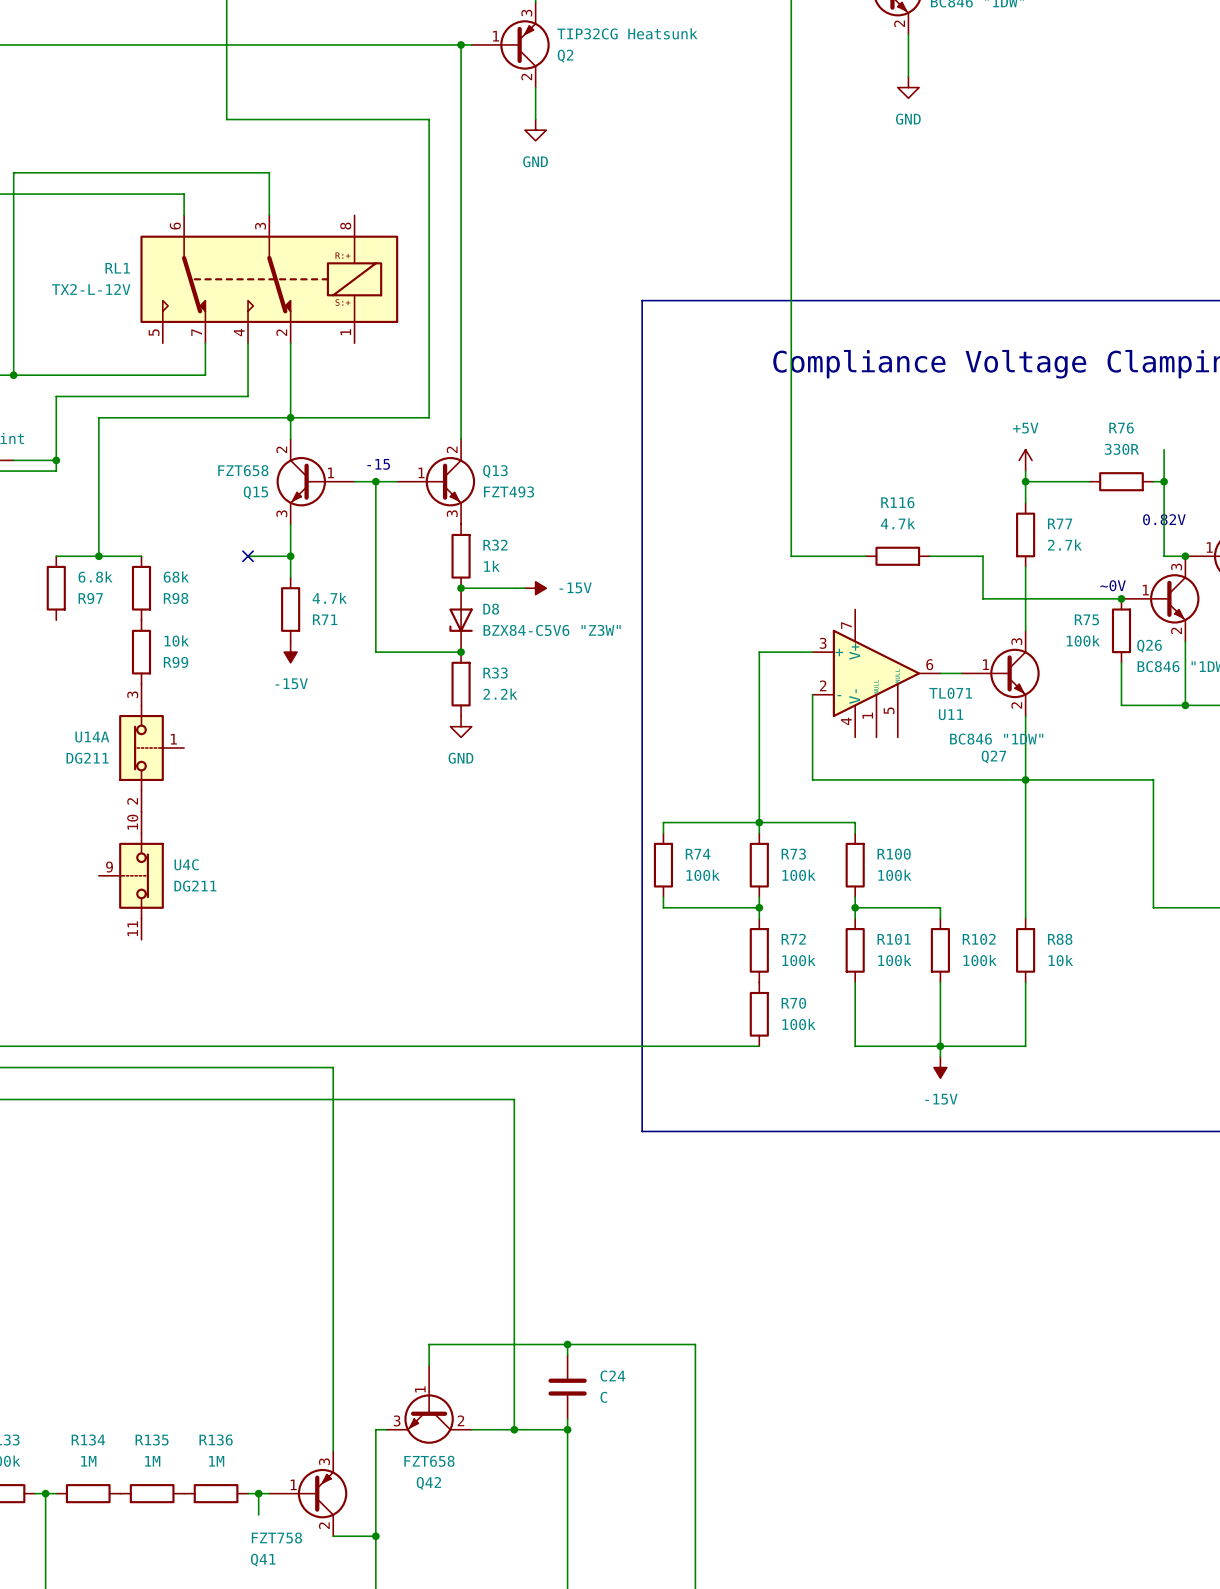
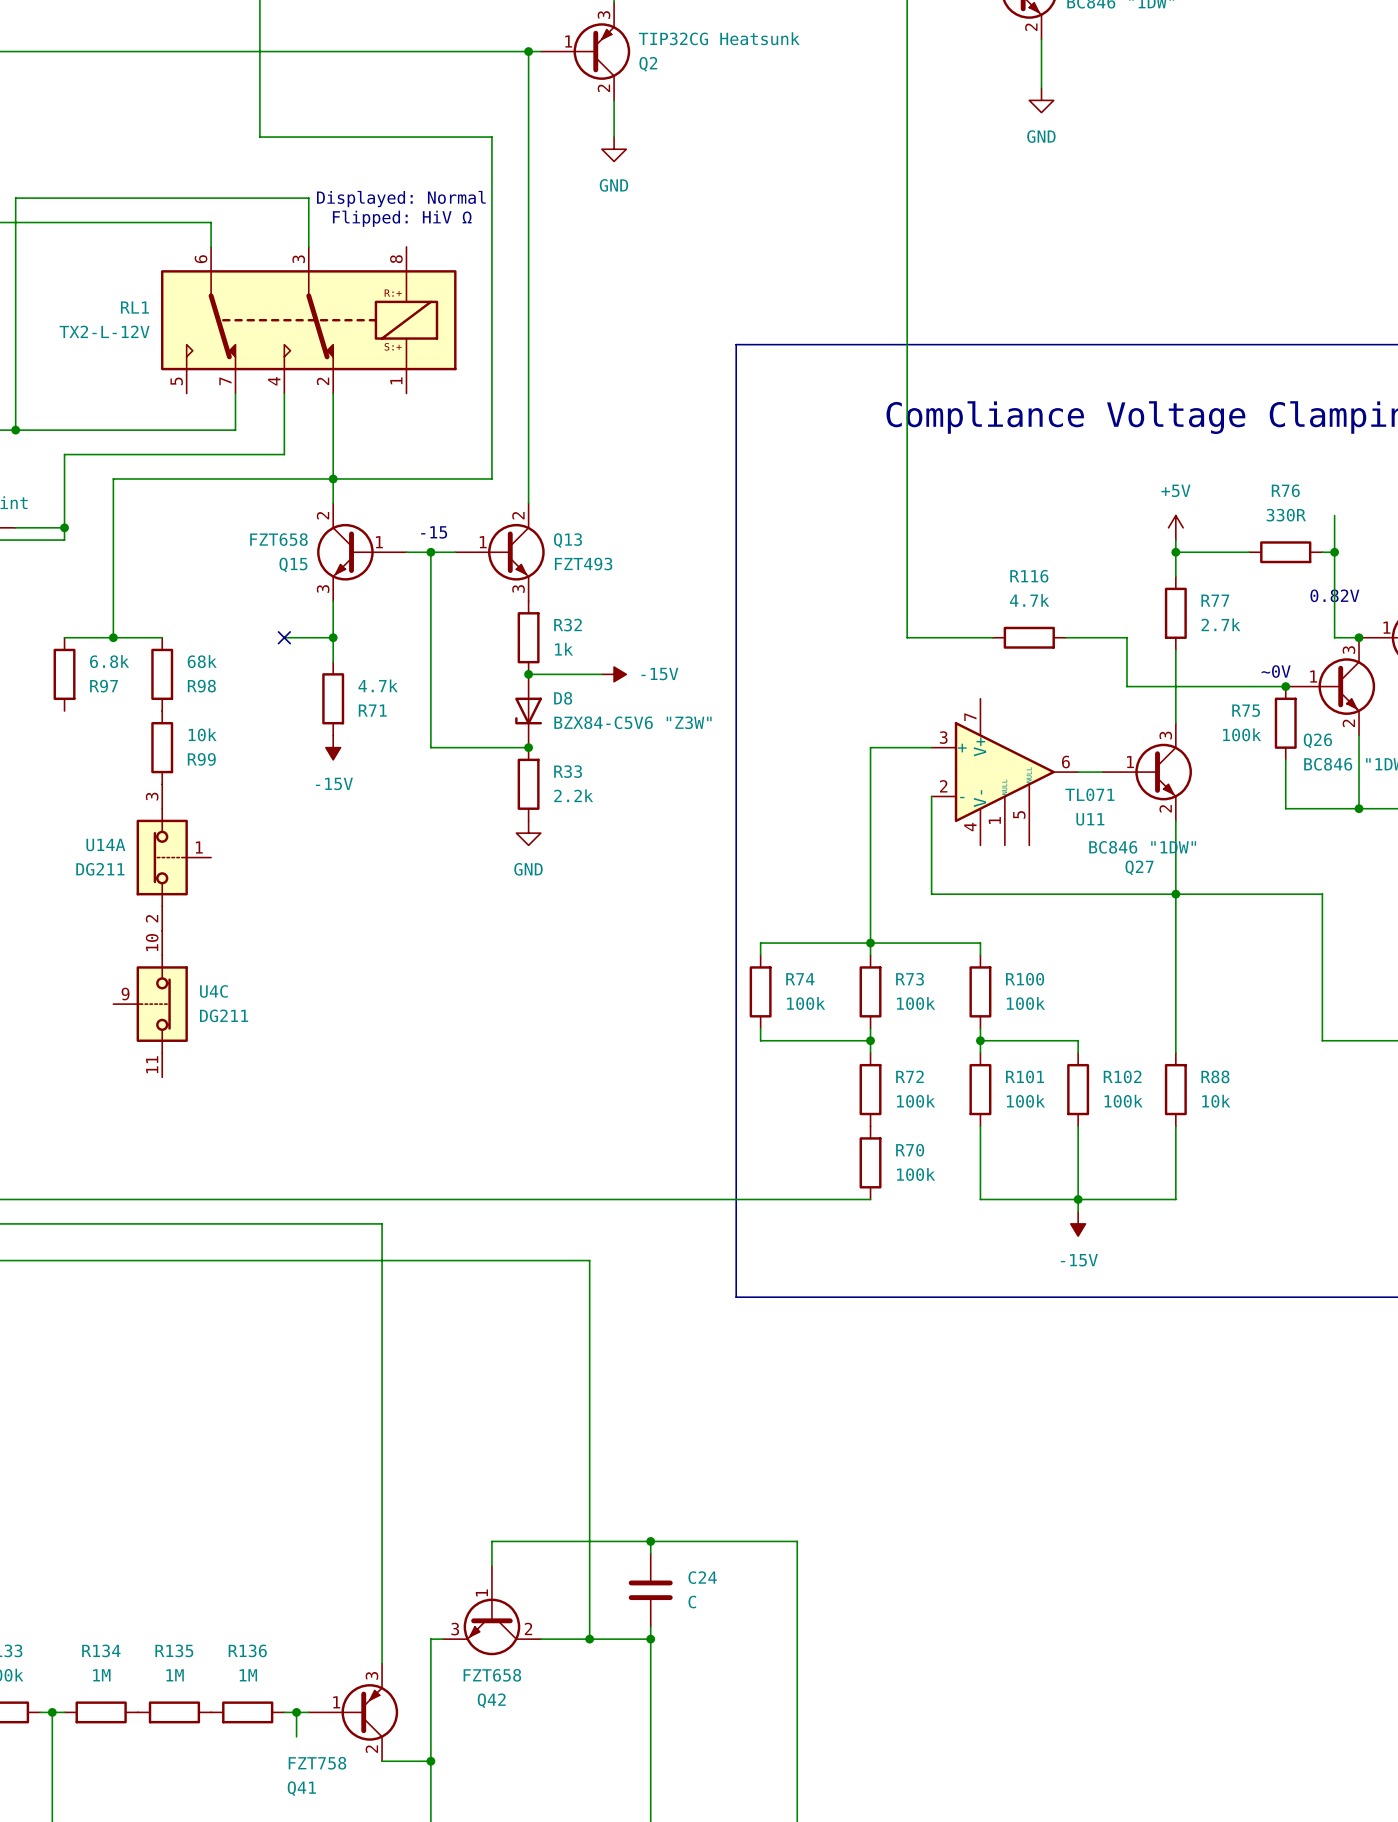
text: none -> Displayed: Normal (401, 199)
text: none -> Flipped: HiV Ω (402, 218)

